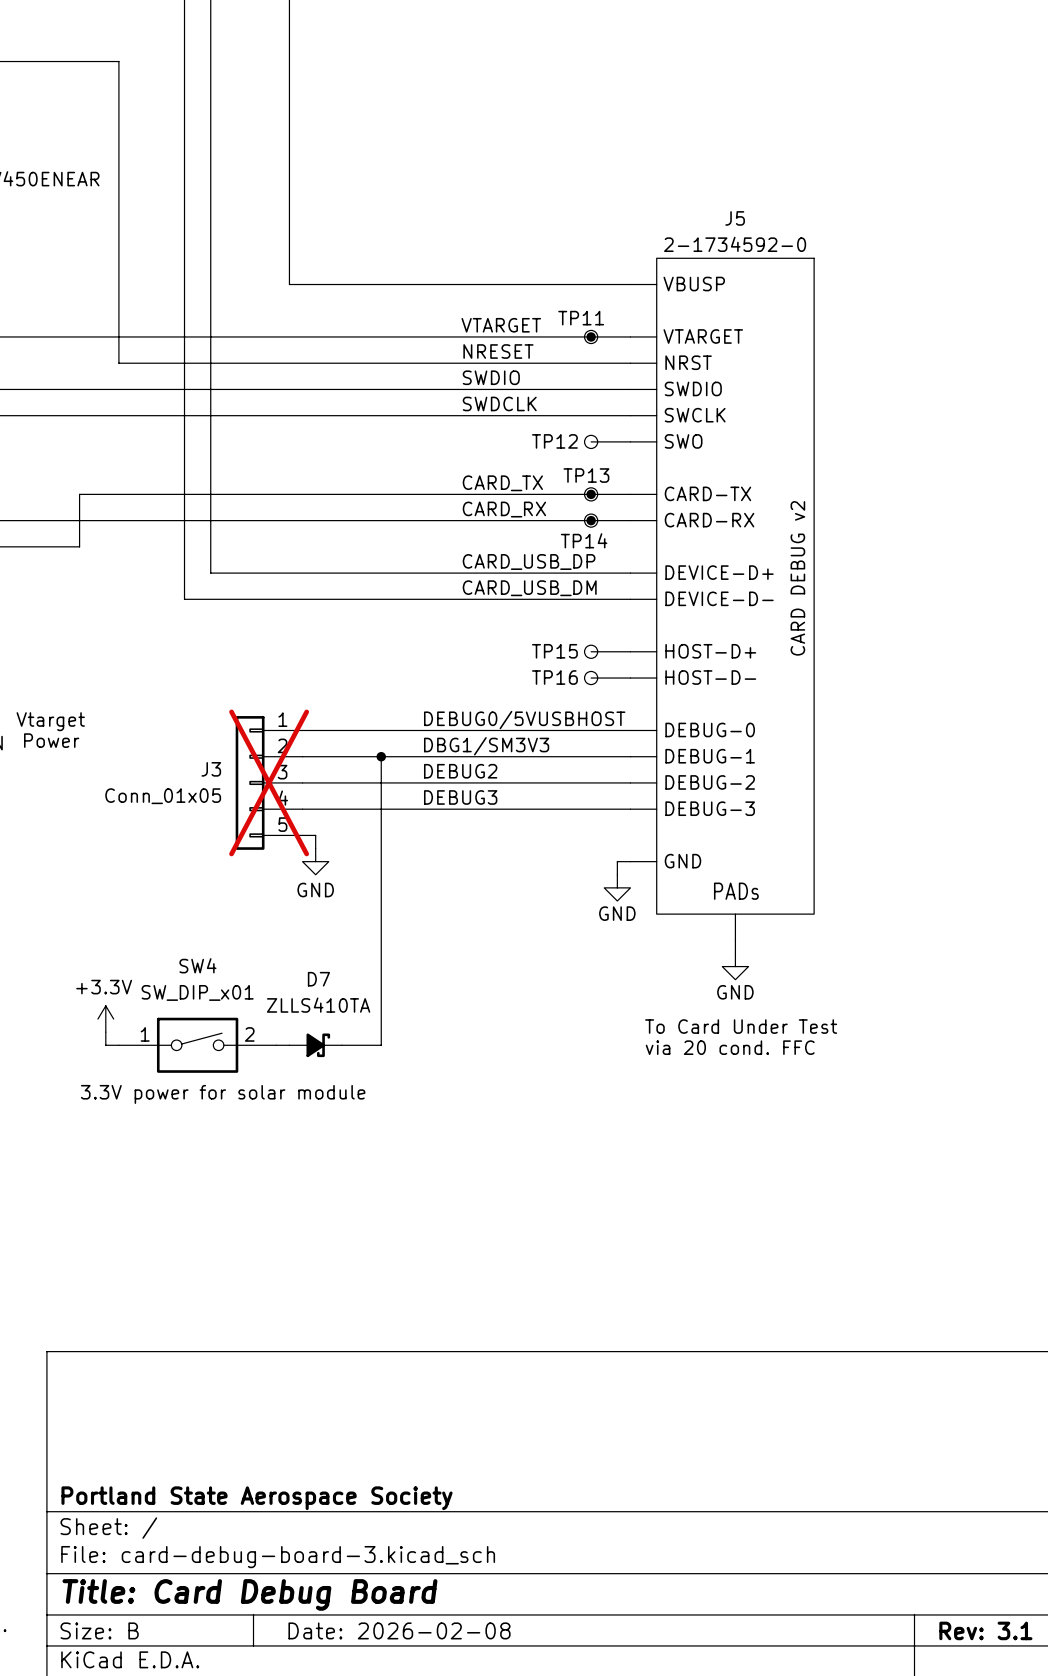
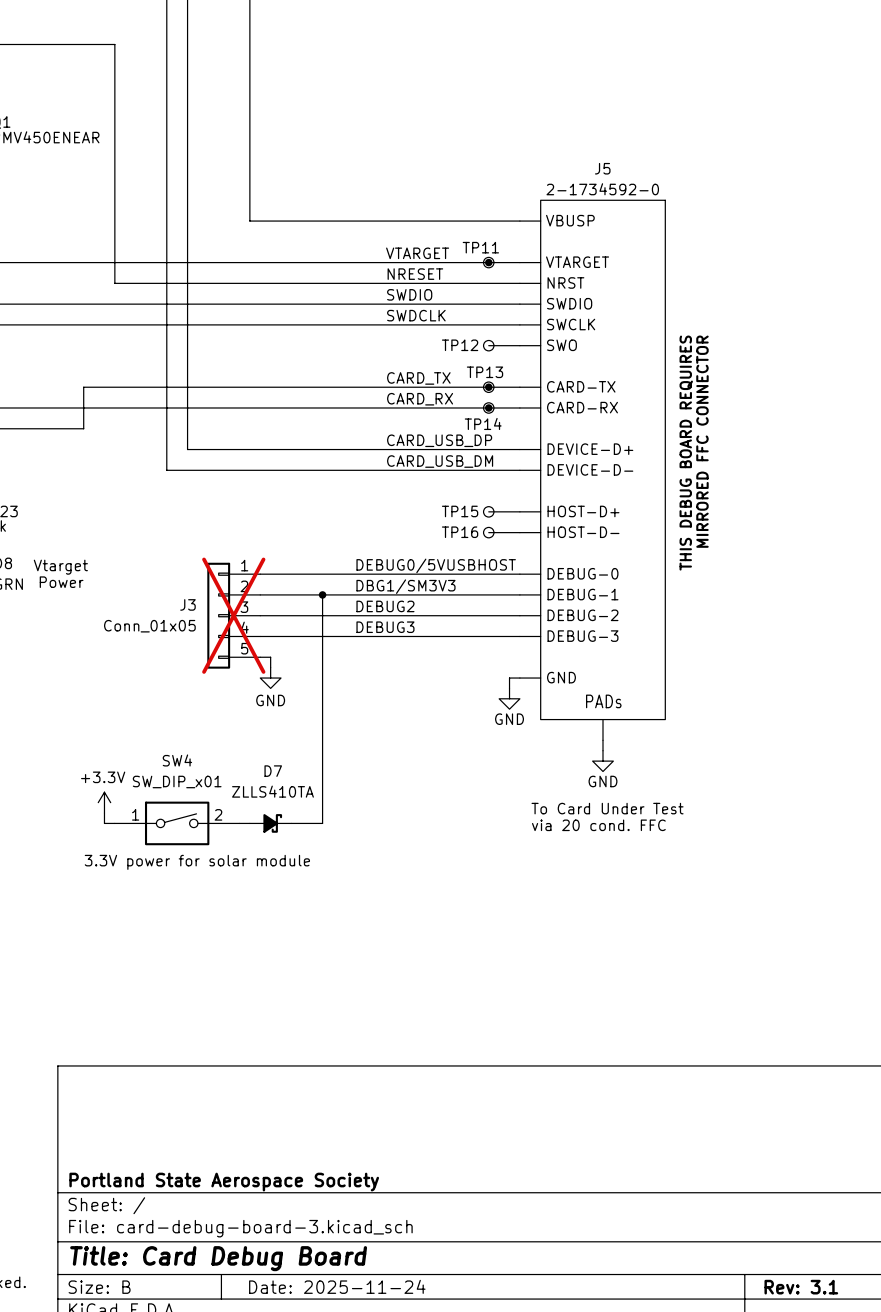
text: none -> MIRRORED FFC CONNECTOR (702, 441)
text: none -> THIS DEBUG BOARD REQUIRES (686, 453)
text: CARD DEBUG v2 (797, 578) -> none
title block: Date: 2026-02-08 (399, 1630) -> Date: 2025-11-24 (337, 1286)

